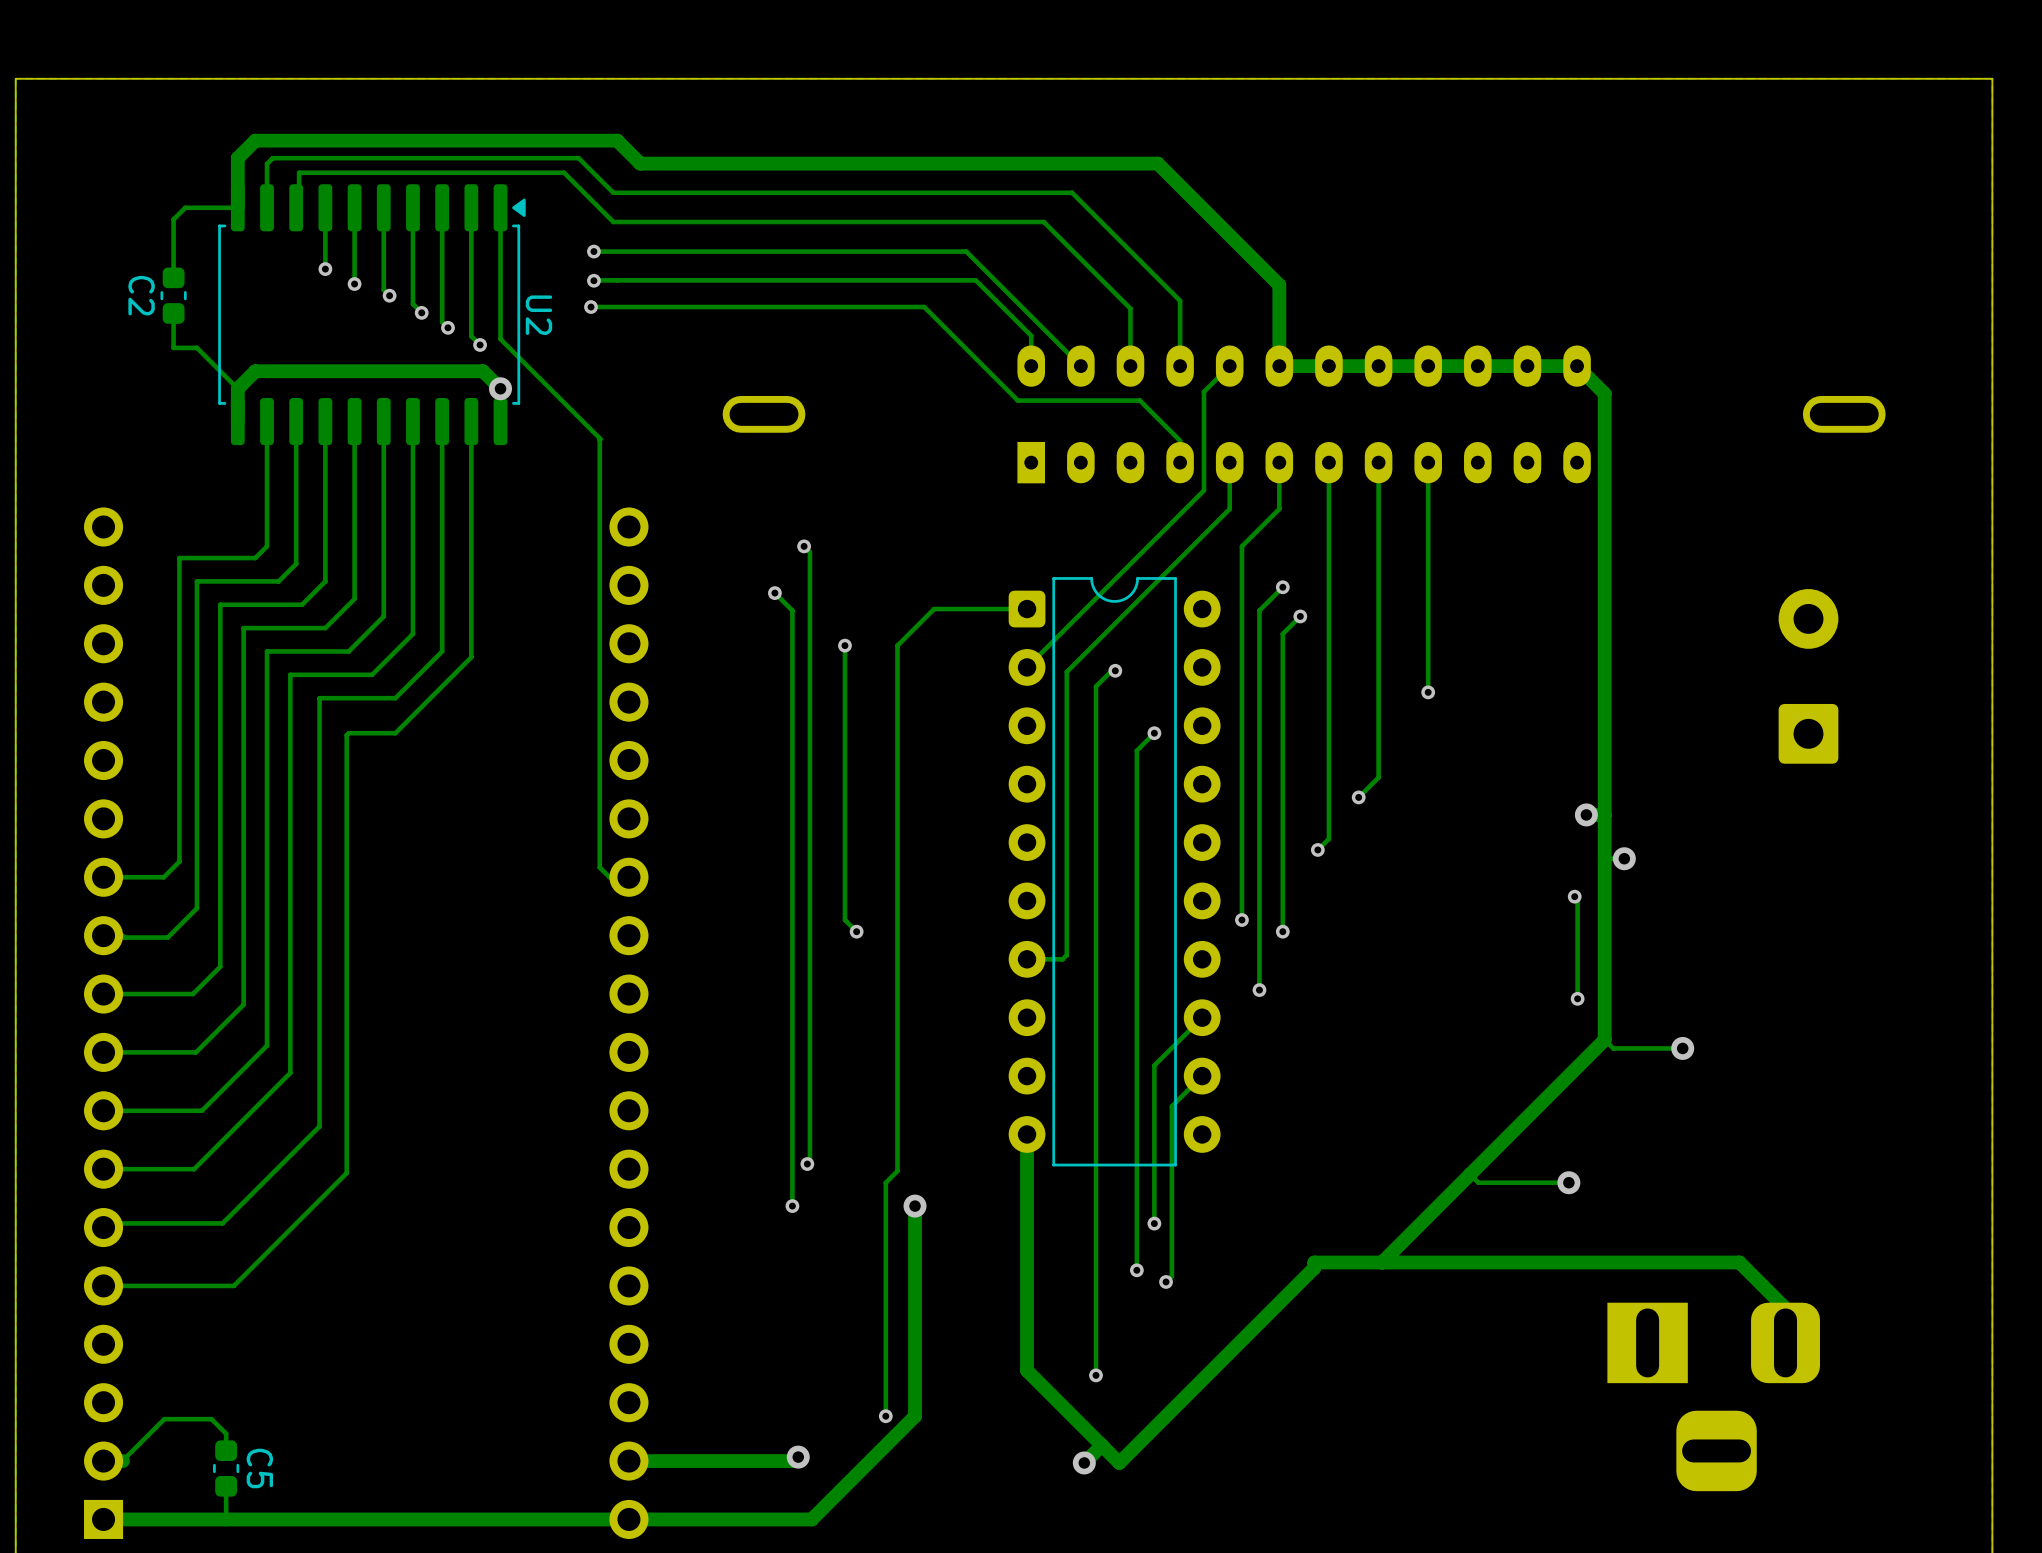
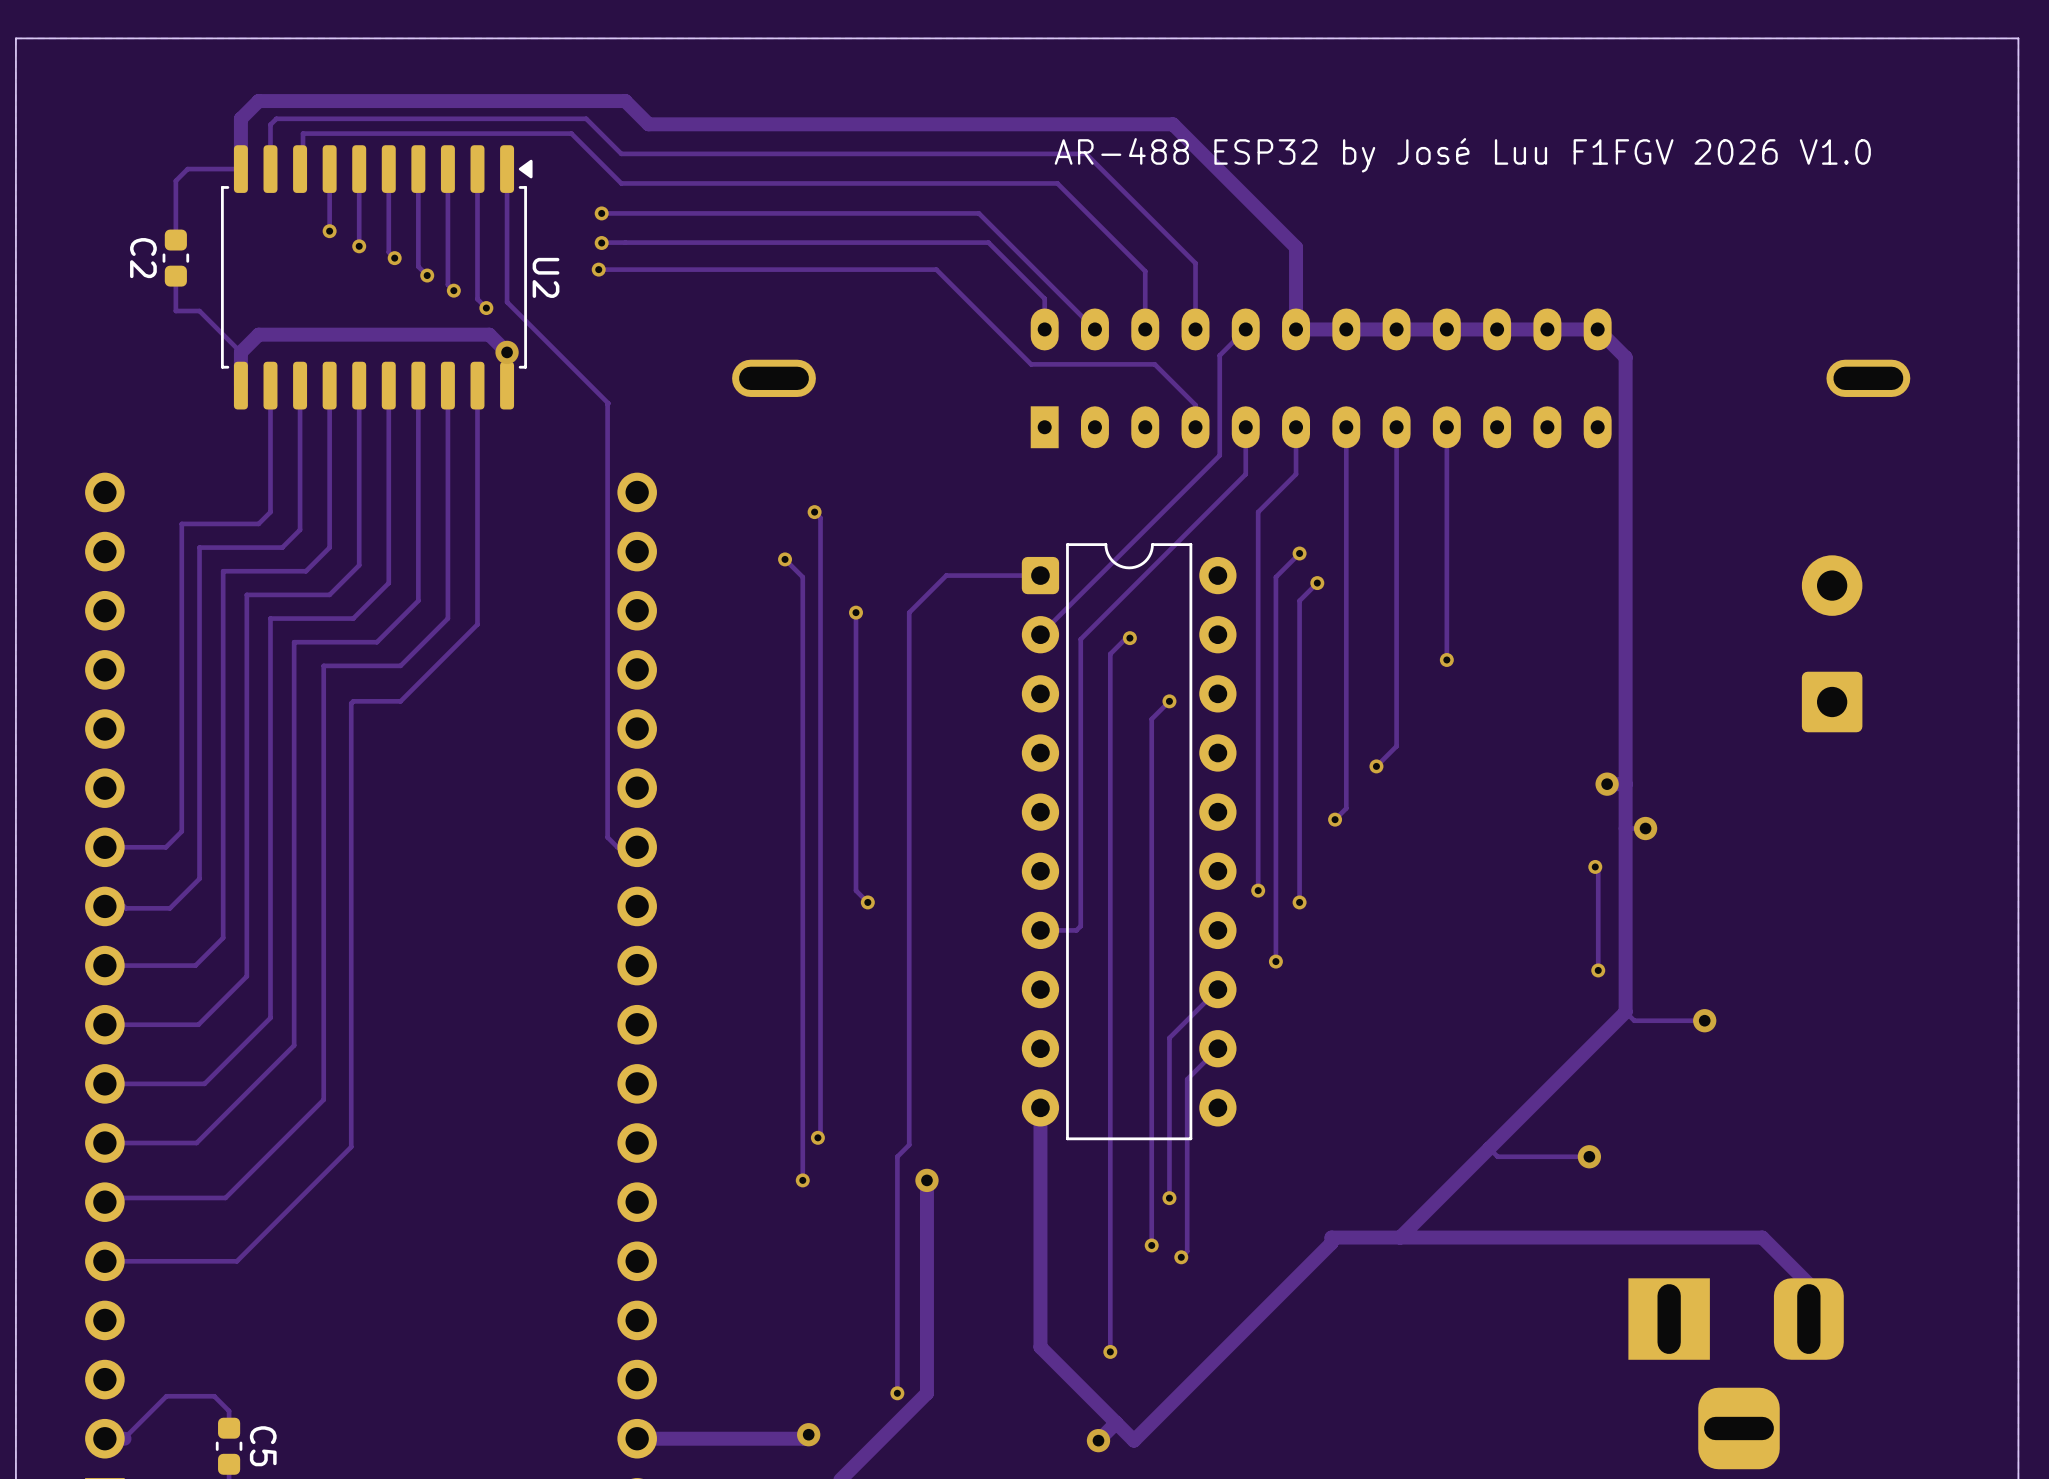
text: none -> AR-488 ESP32 by José Luu F1FGV 2026 V1.0 (1462, 155)

